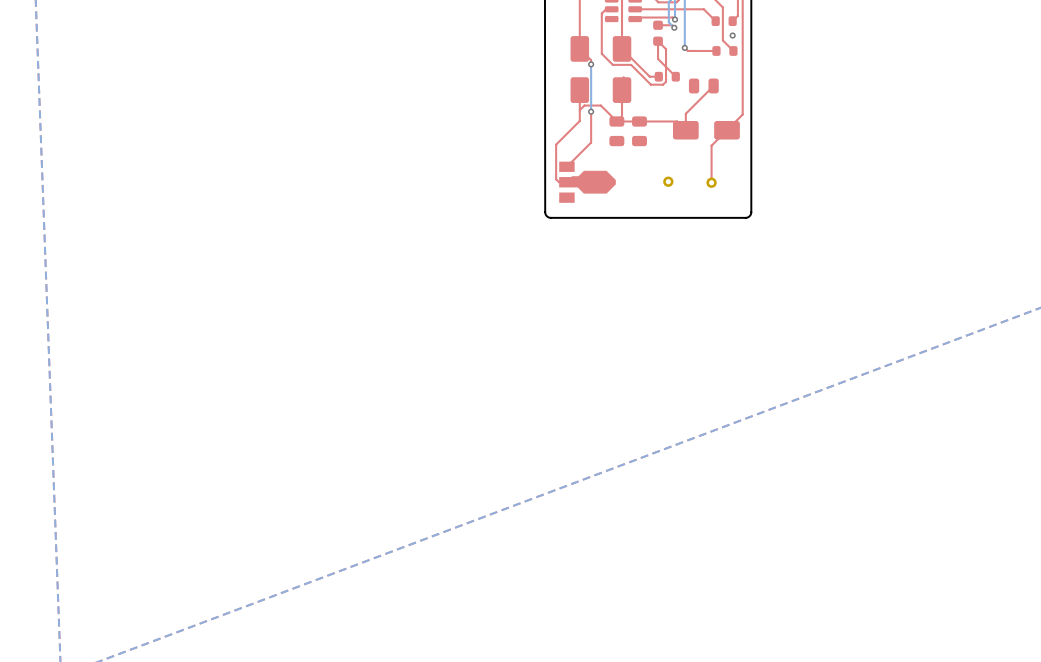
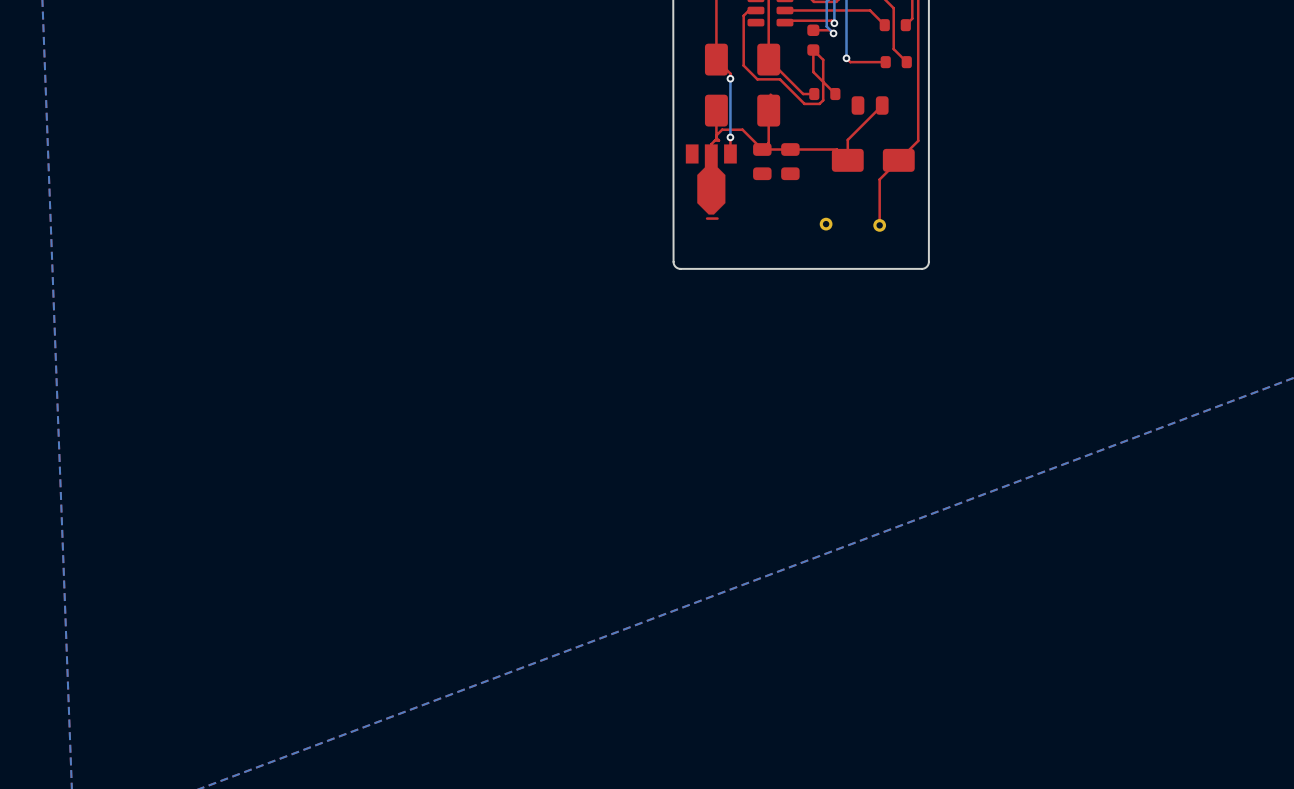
via: (732, 35) -> none
top track: (579, 112) (579, 120) (556, 144) (556, 179) (559, 182) (566, 182) -> (716, 138) (718, 140) (714, 140) (711, 144) (711, 153)
top track: (591, 125) (591, 142) (567, 166) -> none
part rotation: 0° (587, 182) -> 90° clockwise (711, 179)
part position: (587, 182) -> (711, 179)

